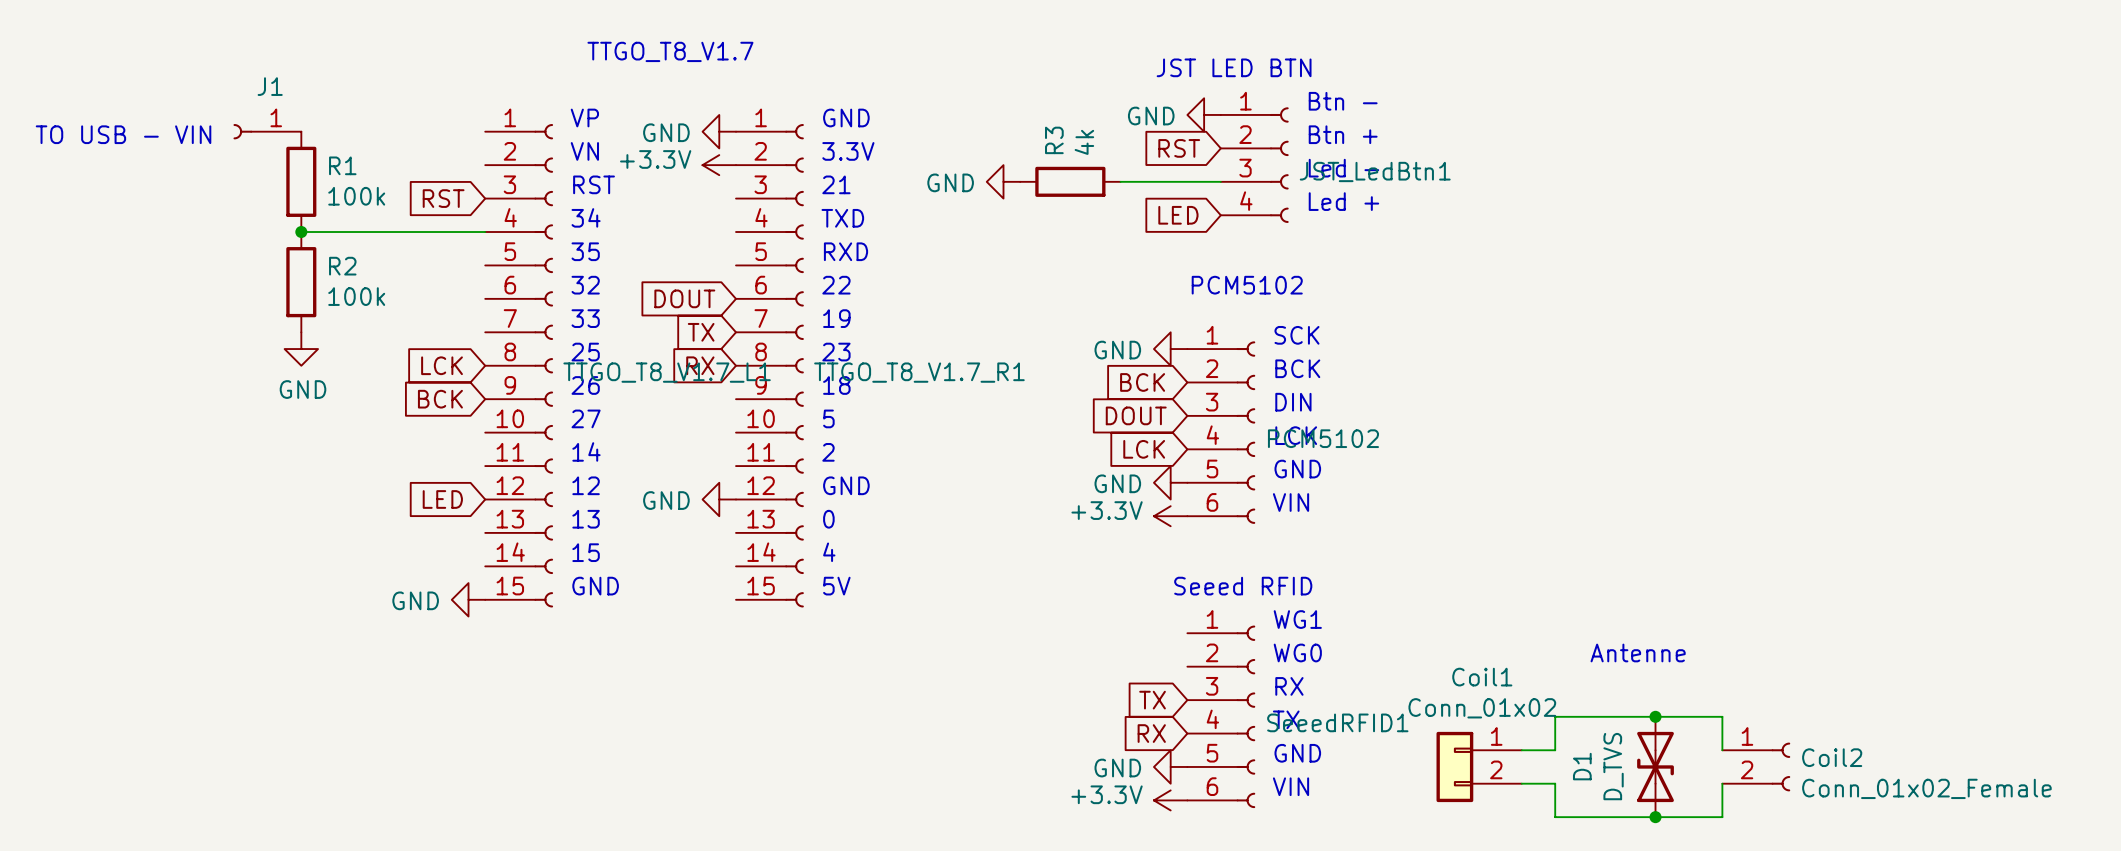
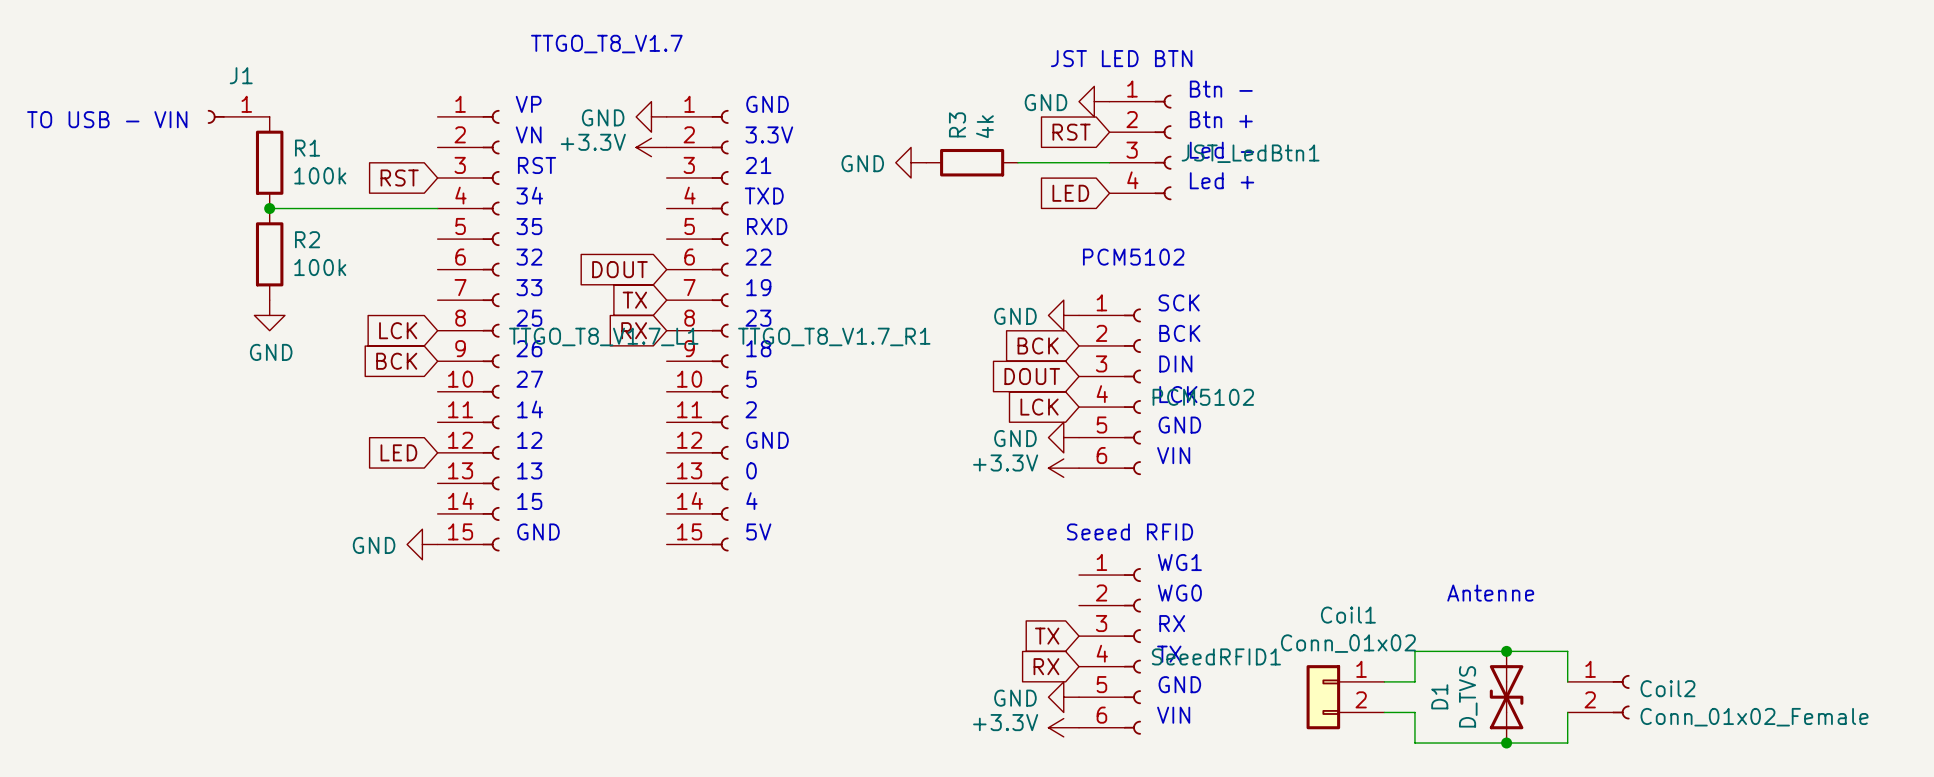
power symbol: GND (719, 499) -> none

